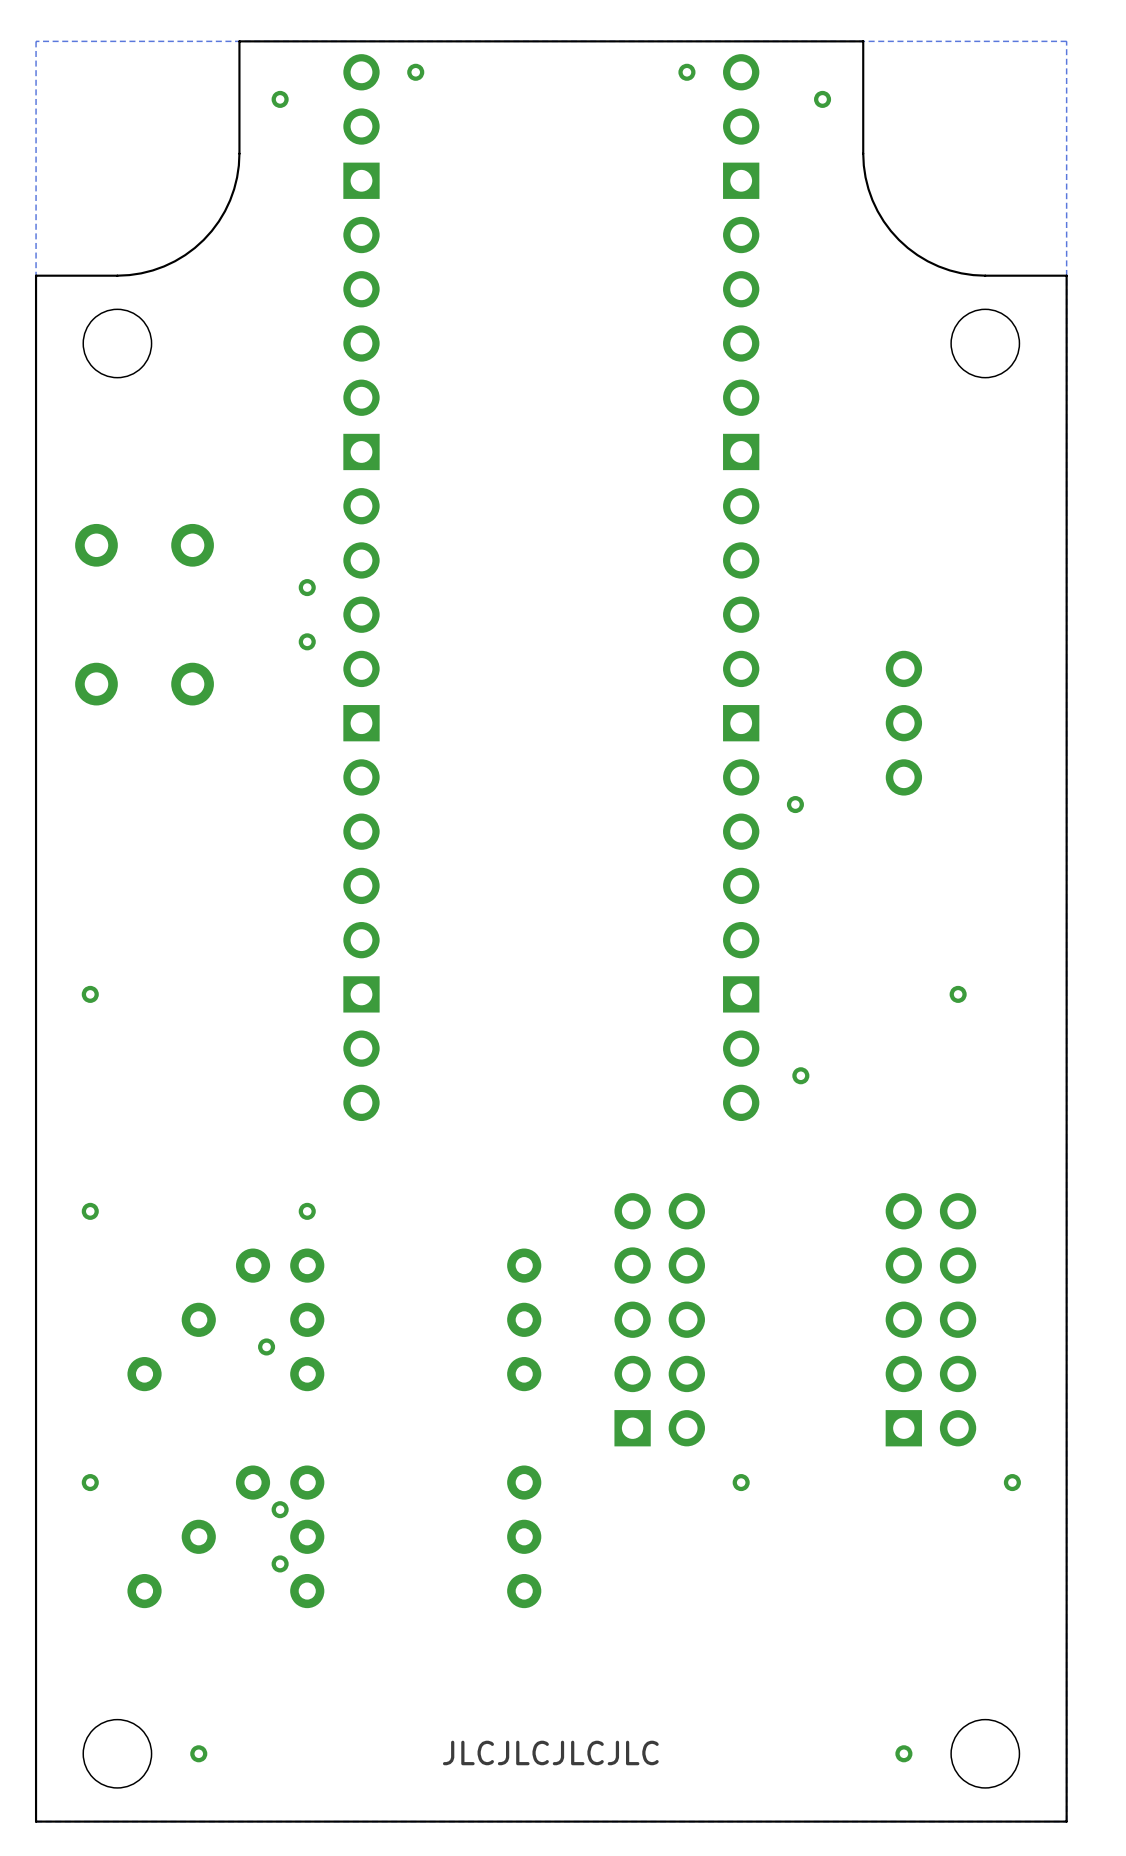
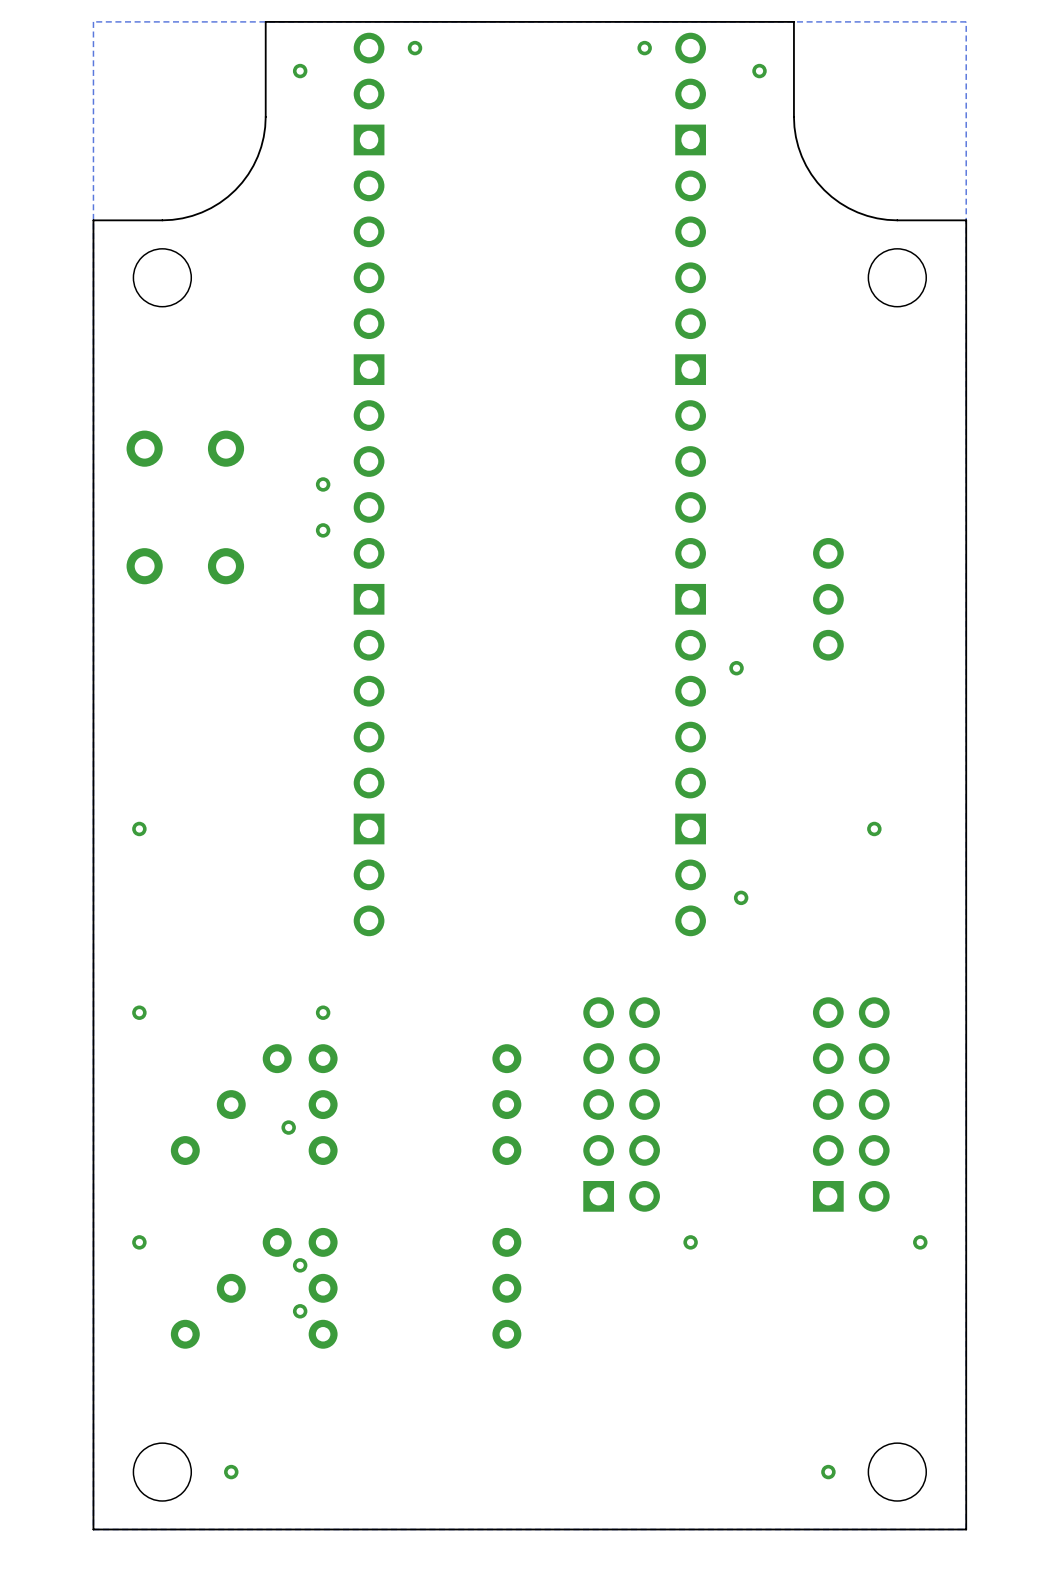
text: JLCJLCJLCJLC (550, 1752) -> none

